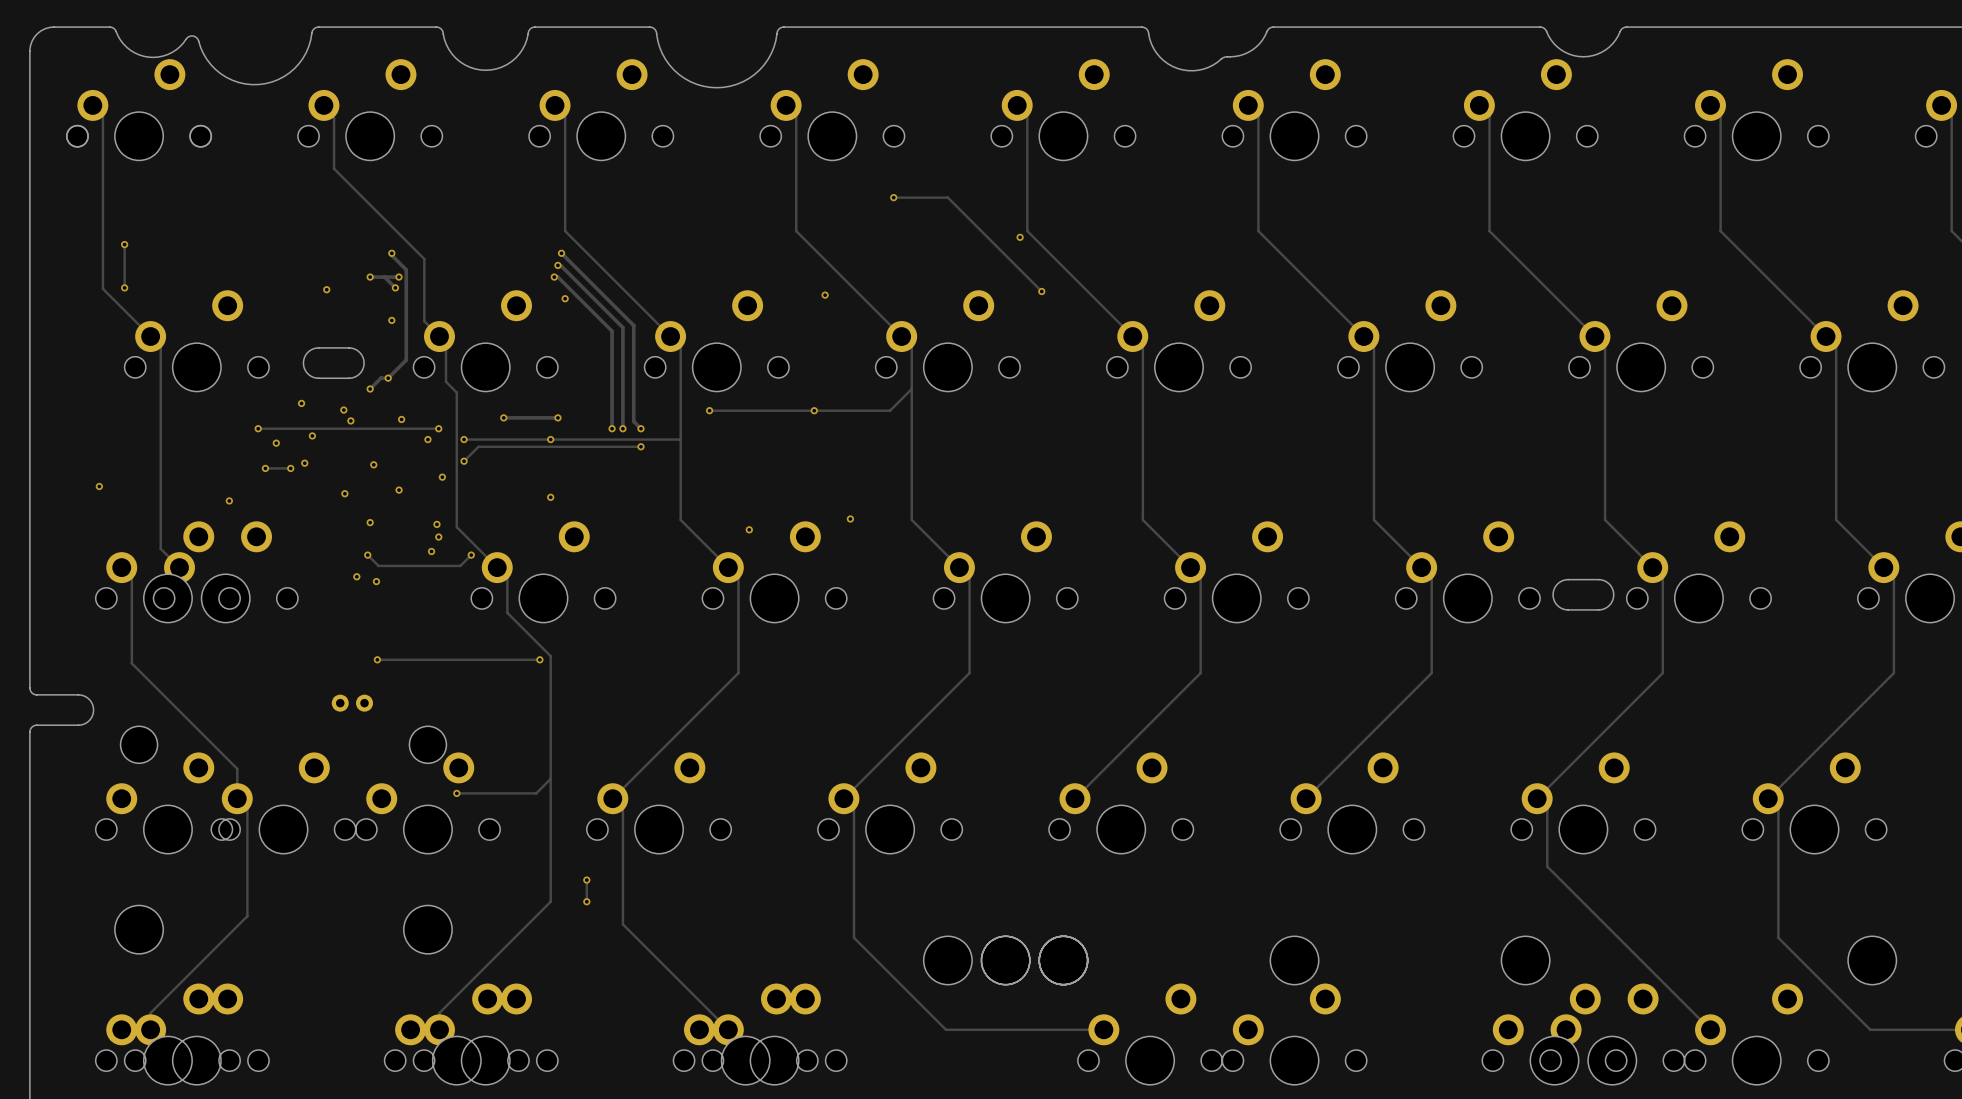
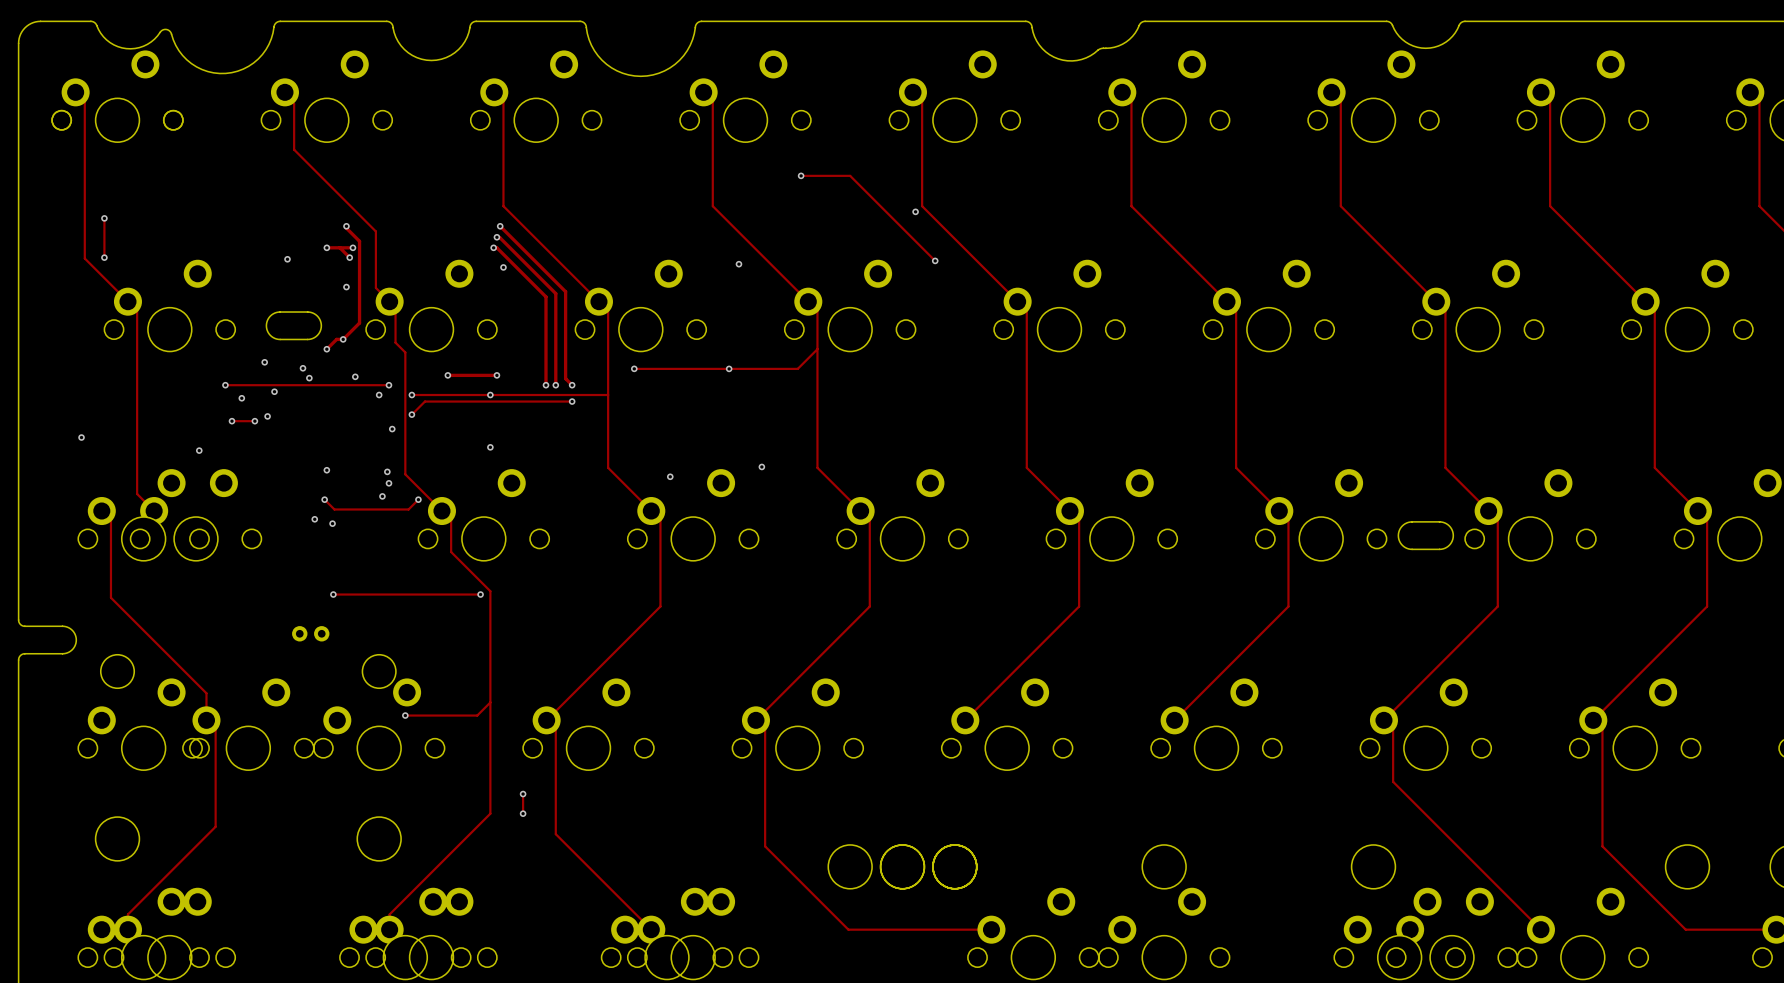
via: (373, 464) -> none
via: (399, 490) -> none
via: (344, 493) -> none

